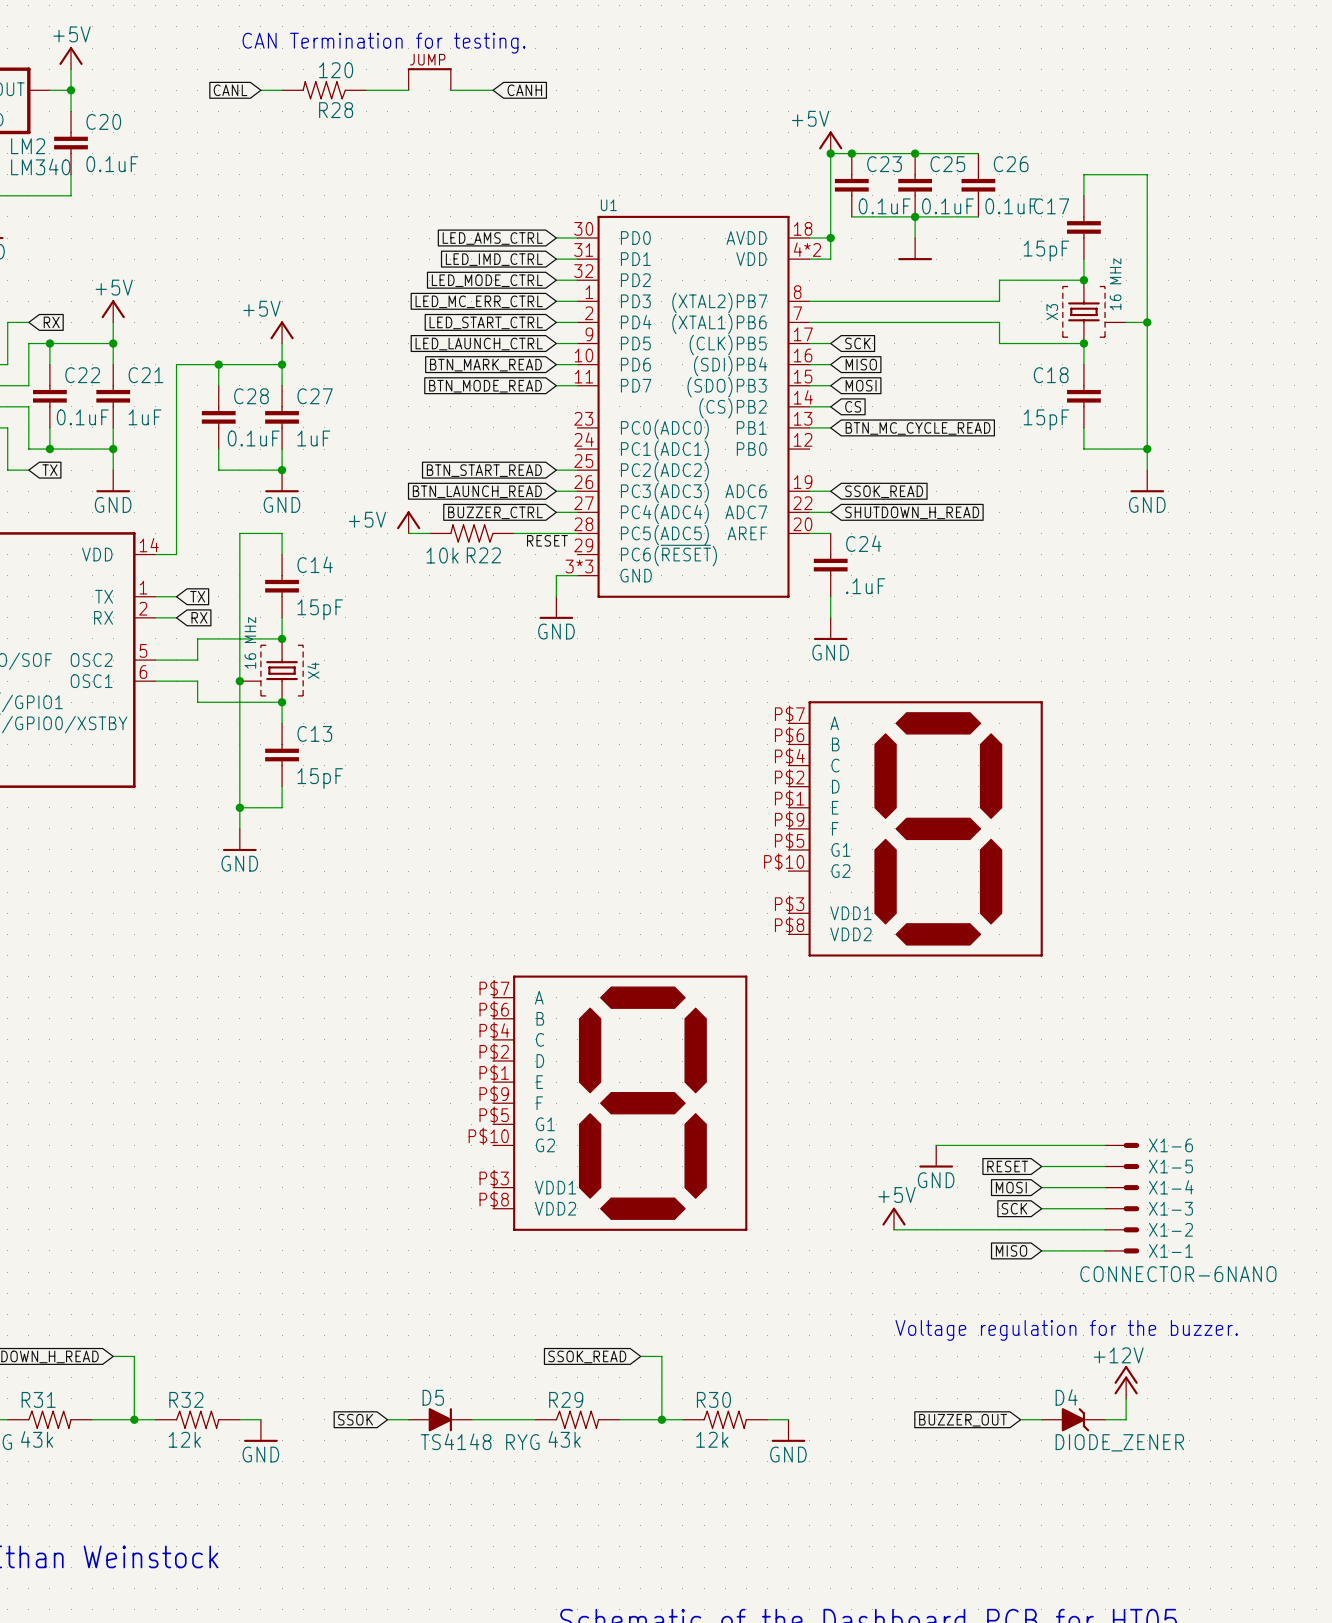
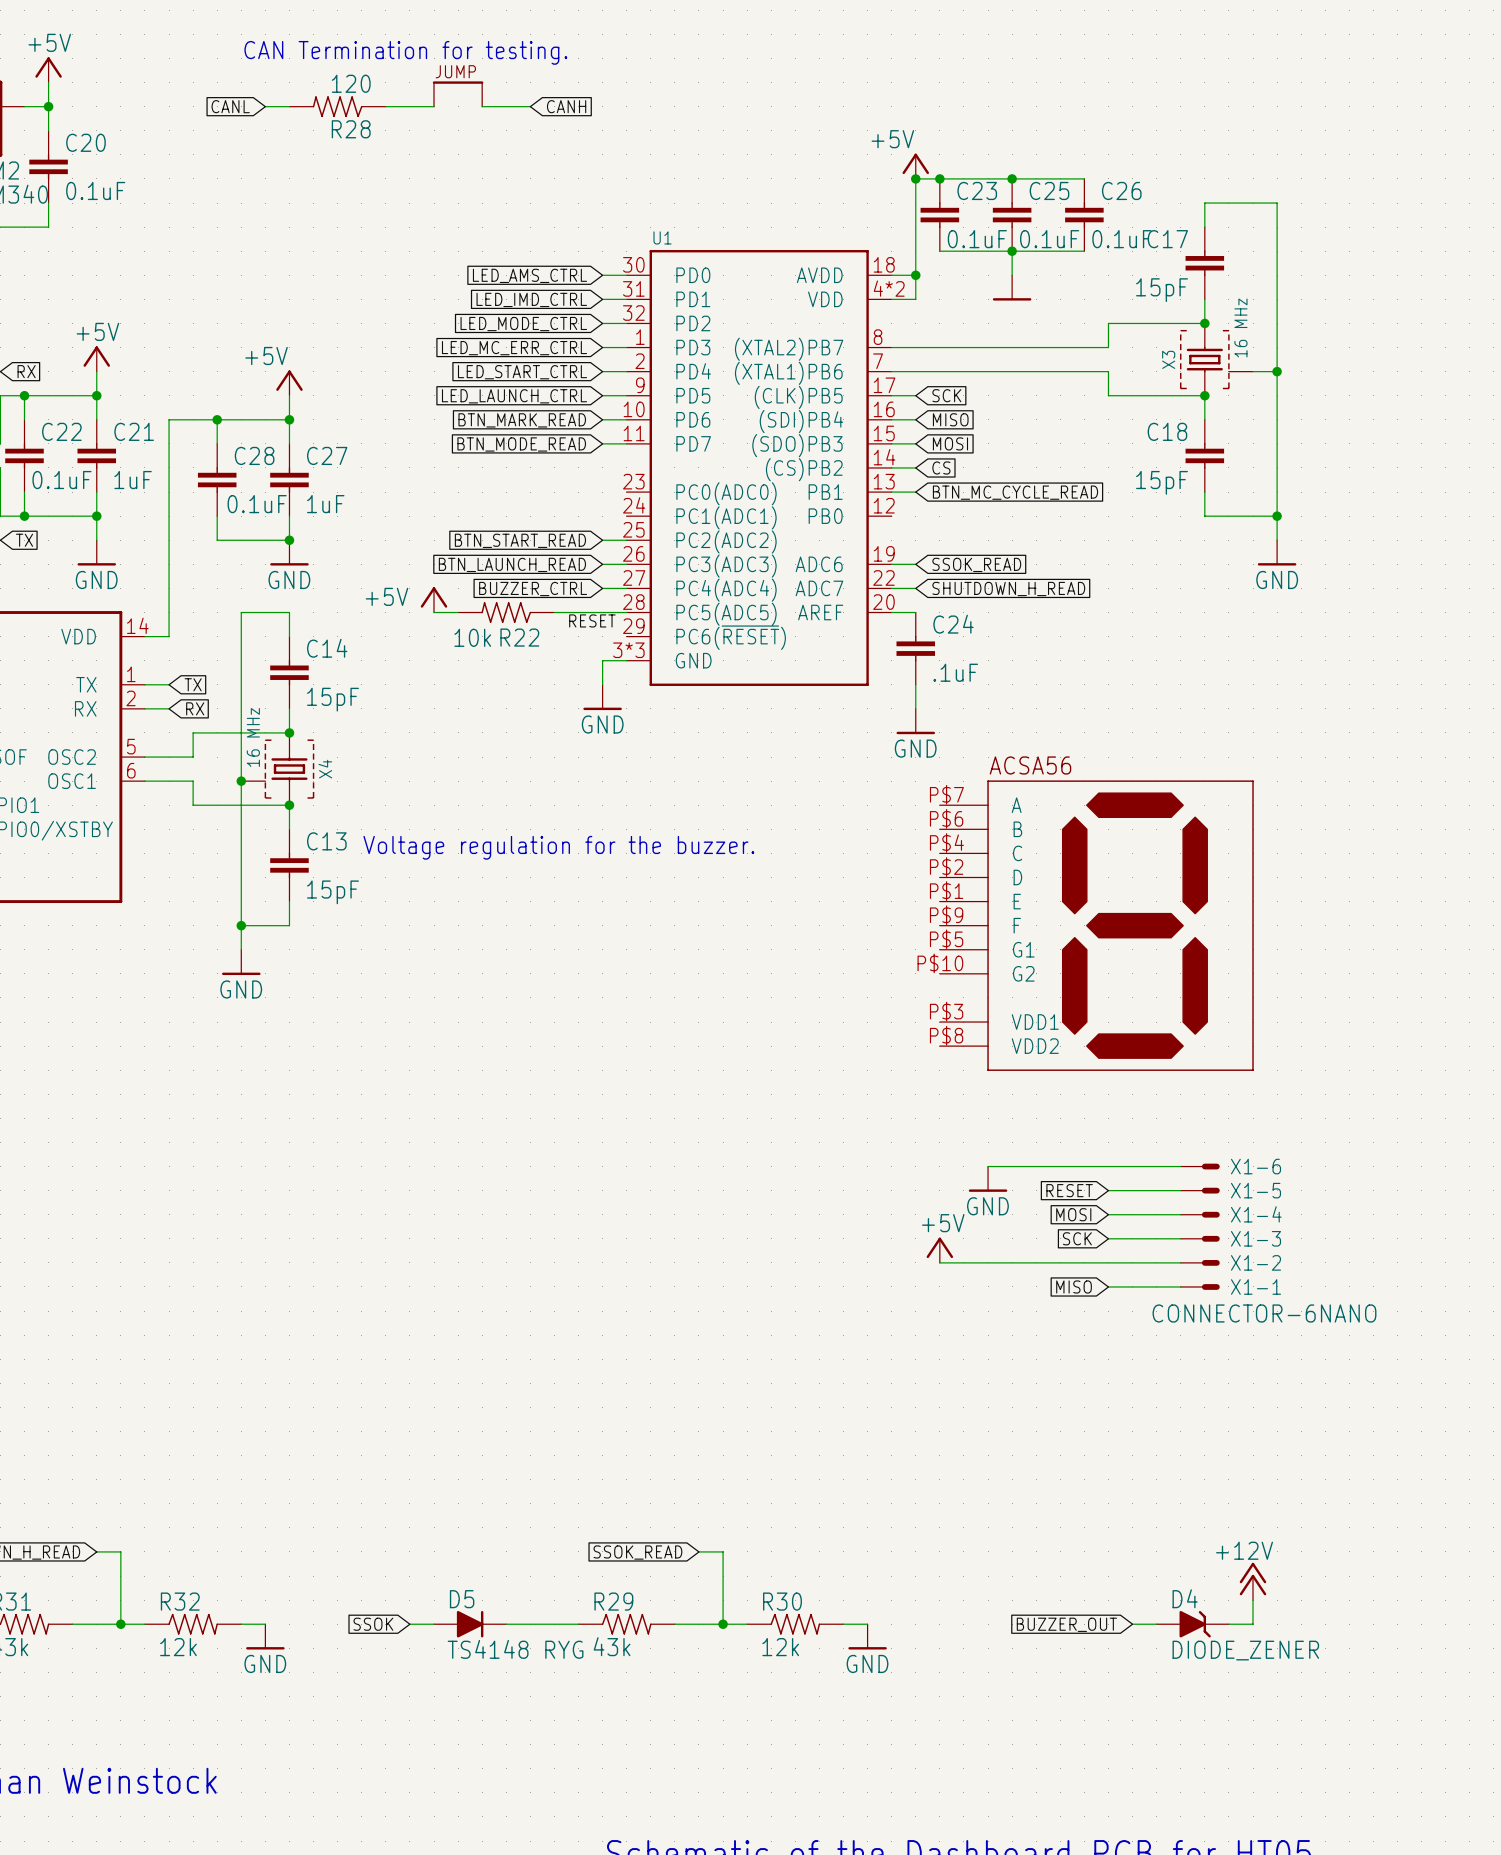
text: none -> Voltage regulation for the buzzer. (558, 847)
part: none -> (1096, 925)
part: (915, 828) -> none
part: (620, 1103) -> none
wire: (936, 1145) (1105, 1145) -> (988, 1166) (1180, 1166)
X1-6 position: (1122, 1145) -> (1200, 1166)
power symbol position: GND (936, 1156) -> GND (988, 1179)
global label position: RESET (1007, 1166) -> RESET (1069, 1190)
wire: (1041, 1166) (1105, 1166) -> (1108, 1190) (1180, 1190)
X1-5 position: (1122, 1166) -> (1200, 1190)
global label position: MOSI (1011, 1187) -> MOSI (1073, 1214)
wire: (1041, 1187) (1105, 1187) -> (1108, 1214) (1180, 1214)
X1-4 position: (1122, 1187) -> (1200, 1214)
global label position: SCK (1014, 1208) -> SCK (1077, 1238)
wire: (1041, 1208) (1105, 1208) -> (1108, 1238) (1180, 1238)
X1-3 position: (1122, 1208) -> (1200, 1238)
power symbol position: +5V (894, 1218) -> +5V (939, 1250)
wire: (894, 1229) (1105, 1229) -> (939, 1262) (1180, 1262)
X1-2 position: (1122, 1229) -> (1200, 1262)
global label position: MISO (1011, 1250) -> MISO (1074, 1286)
wire: (1041, 1250) (1105, 1250) -> (1108, 1286) (1180, 1286)
X1-1 position: (1122, 1250) -> (1200, 1286)
text: Voltage regulation for the buzzer. (1066, 1330) -> none

